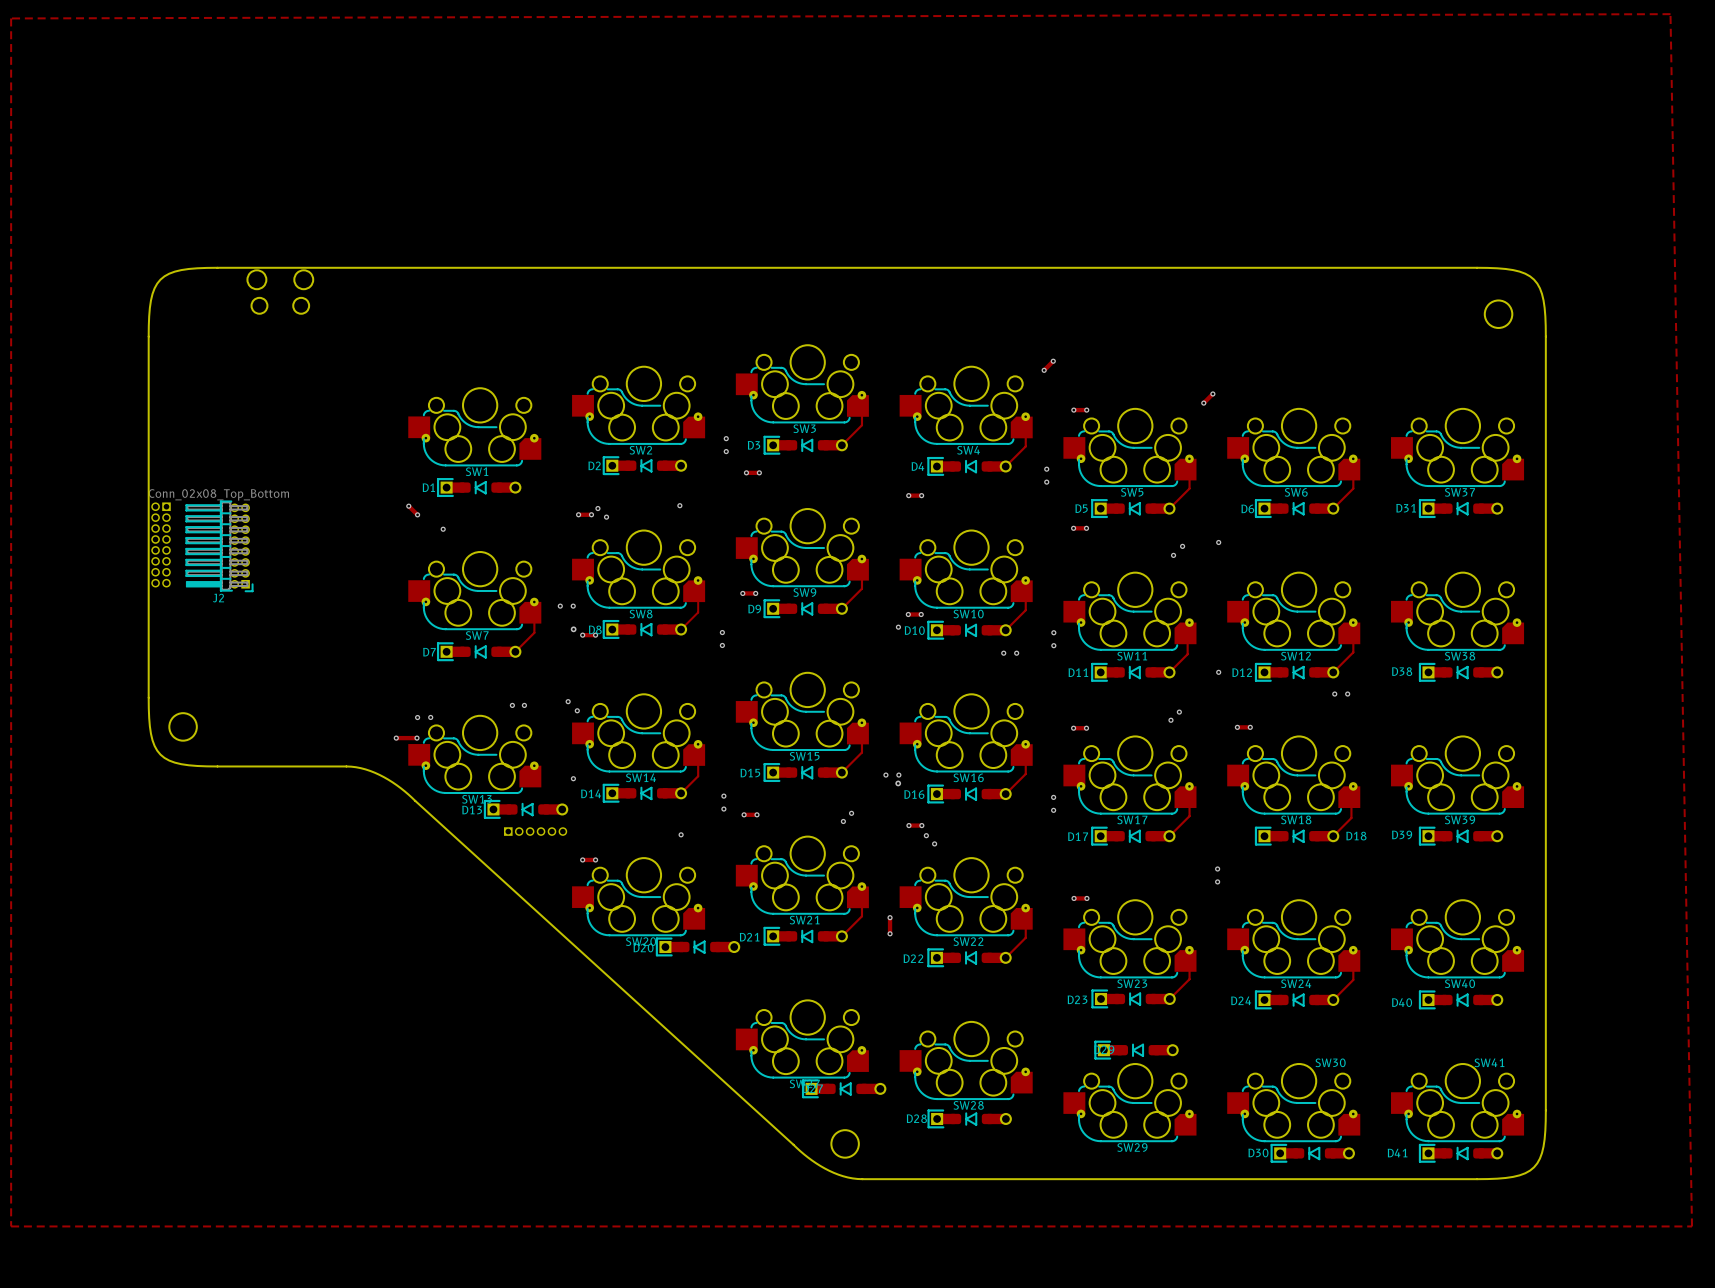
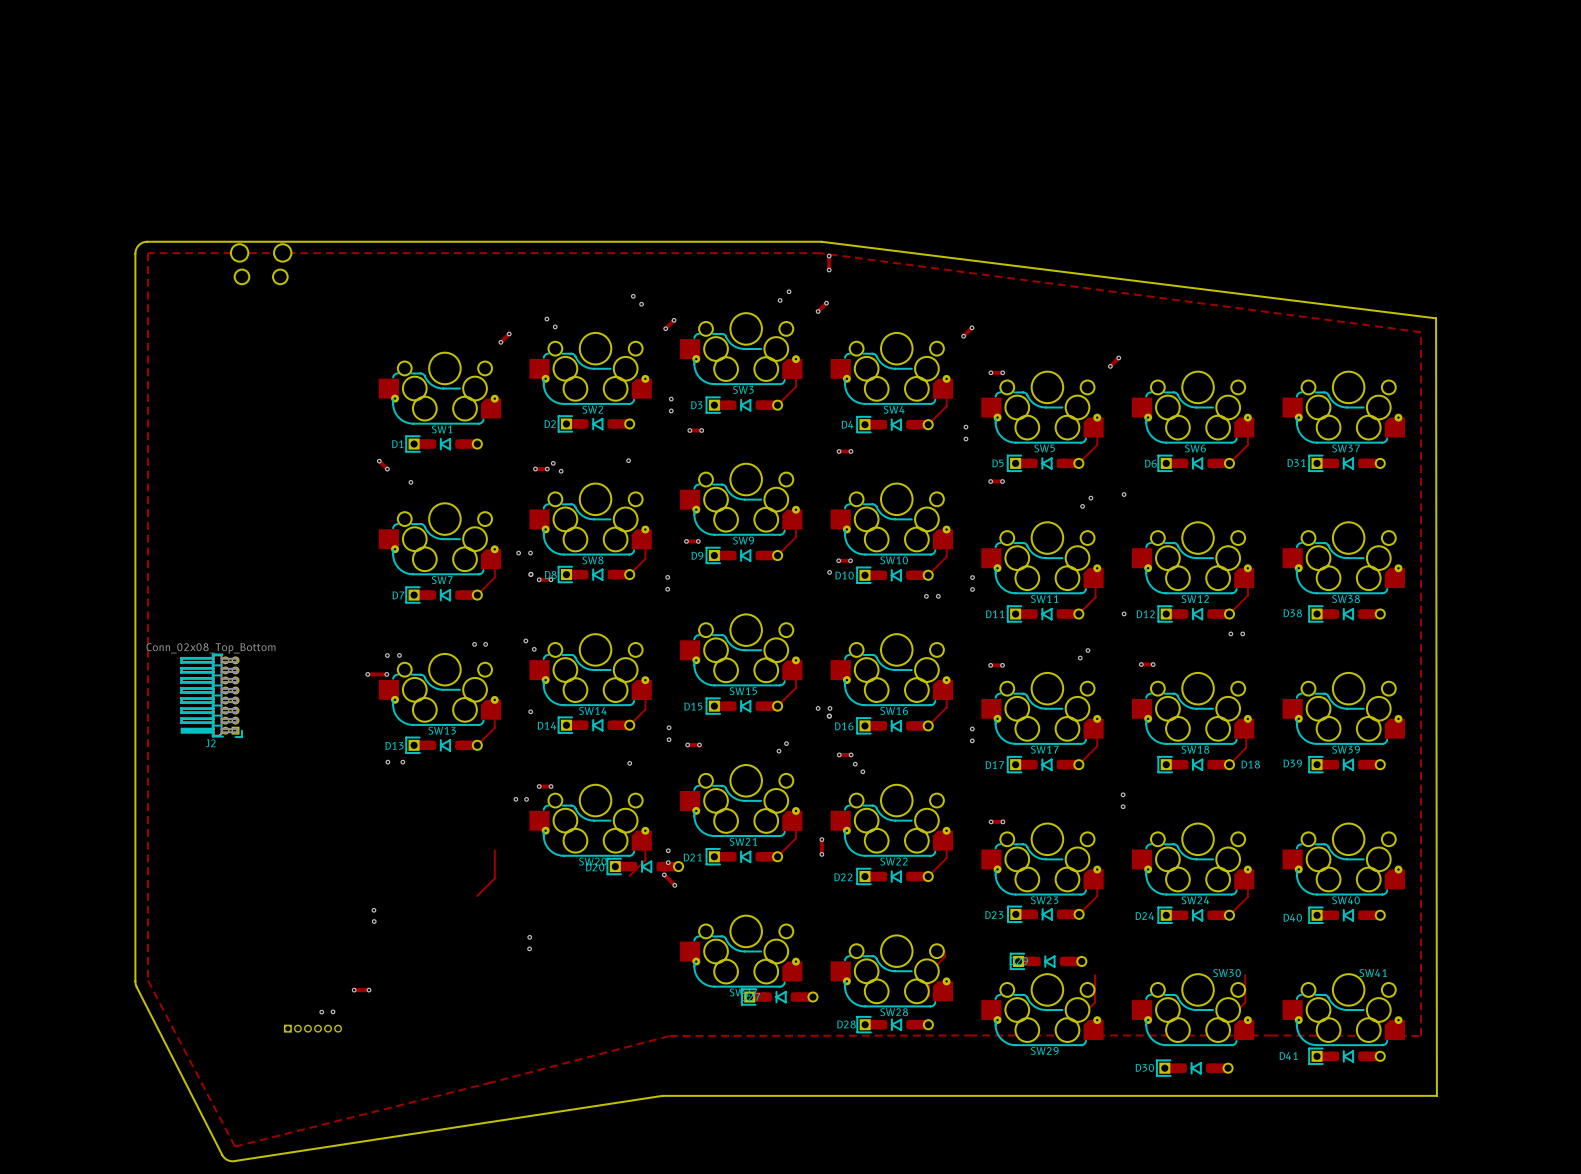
zone outline: (1670, 14) (1692, 1226) (11, 1226) (11, 18) (1670, 14) -> (148, 253) (148, 980) (234, 1146) (669, 1035) (1421, 1035) (1421, 332) (820, 253) (148, 253)
board edge: (217, 267) (1477, 267) (1513, 270) (1530, 276) (1537, 283) (1542, 293) (1545, 336) (1545, 1110) (1543, 1146) (1537, 1163) (1530, 1170) (1519, 1175) (1487, 1179) (862, 1179) (843, 1176) (820, 1165) (800, 1151) (408, 794) (388, 779) (370, 770) (351, 766) (197, 765) (174, 762) (164, 757) (157, 750) (152, 740) (148, 708) (149, 307) (154, 288) (164, 276) (181, 270) (217, 267) -> (135, 981) (135, 253) (136, 247) (141, 243) (147, 241) (821, 241) (1436, 318) (1436, 1095) (662, 1095) (231, 1161) (225, 1158) (222, 1154) (135, 981)
track: none -> (829, 256) (829, 270)
via: none -> (829, 256)
via: none -> (829, 270)
round board edge: [1484, 299, 1513, 329] -> none
via: none -> (789, 291)
via: none -> (633, 296)
via: none -> (780, 300)
track: none -> (826, 303) (818, 311)
via: none -> (826, 303)
via: none -> (641, 304)
via: none -> (818, 311)
via: none -> (546, 319)
track: none -> (674, 320) (665, 328)
via: none -> (674, 320)
via: none -> (555, 326)
via: none -> (665, 328)
track: none -> (509, 333) (500, 342)
via: none -> (509, 333)
via: none -> (500, 342)
part: (161, 544) -> none
J2 position: (219, 546) -> (211, 695)
round board edge: [168, 712, 198, 742] -> none
track: none -> (494, 699) (494, 727) (477, 745)
D13 position: (526, 809) -> (444, 745)
part: (535, 831) -> none
via: none -> (387, 762)
via: none -> (402, 762)
via: none -> (515, 799)
via: none -> (526, 799)
track: none -> (645, 830) (645, 860) (629, 875)
track: none -> (494, 850) (494, 878) (477, 895)
via: none -> (668, 850)
via: none -> (668, 862)
track: none -> (664, 874) (674, 885)
via: none -> (664, 874)
via: none -> (674, 885)
via: none -> (373, 910)
via: none -> (374, 921)
via: none -> (529, 937)
via: none -> (529, 948)
track: none -> (944, 951) (944, 957) (929, 972) (929, 996)
track: none -> (1095, 975) (1095, 1002) (1076, 1020)
track: none -> (1245, 975) (1245, 1002) (1226, 1020)
track: none -> (354, 990) (369, 990)
via: none -> (354, 990)
via: none -> (369, 990)
via: none -> (321, 1012)
via: none -> (333, 1011)
part: none -> (312, 1028)
round board edge: [830, 1129, 860, 1159] -> none
D30 position: (1312, 1153) -> (1194, 1068)

